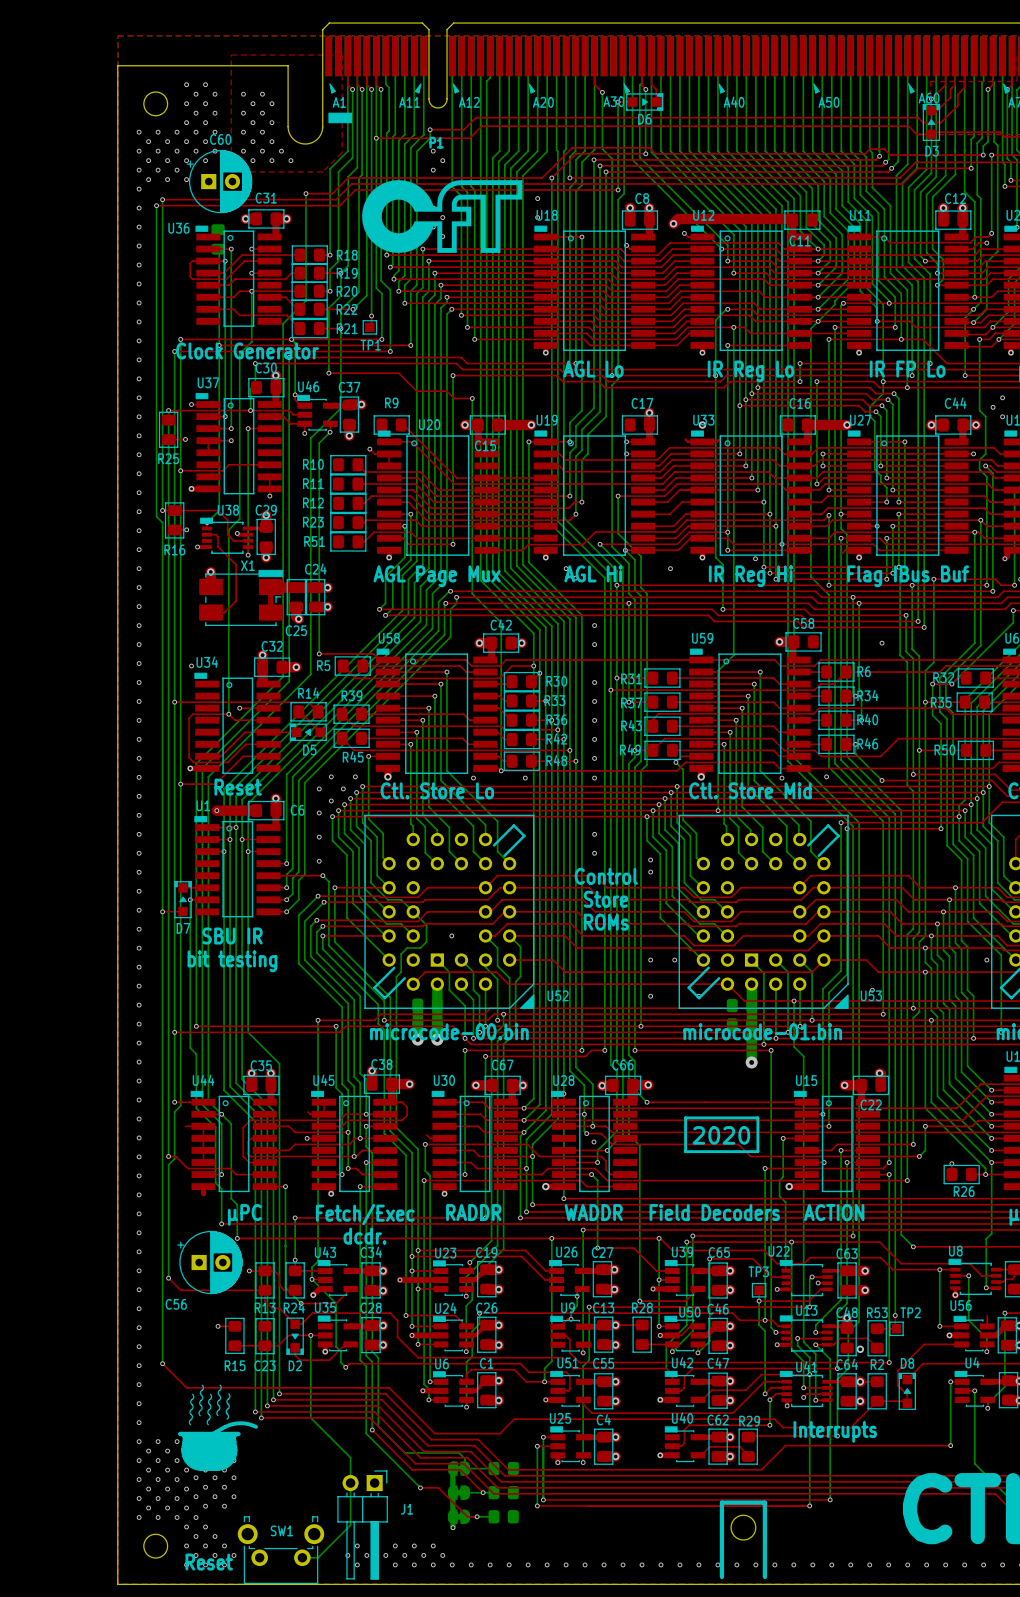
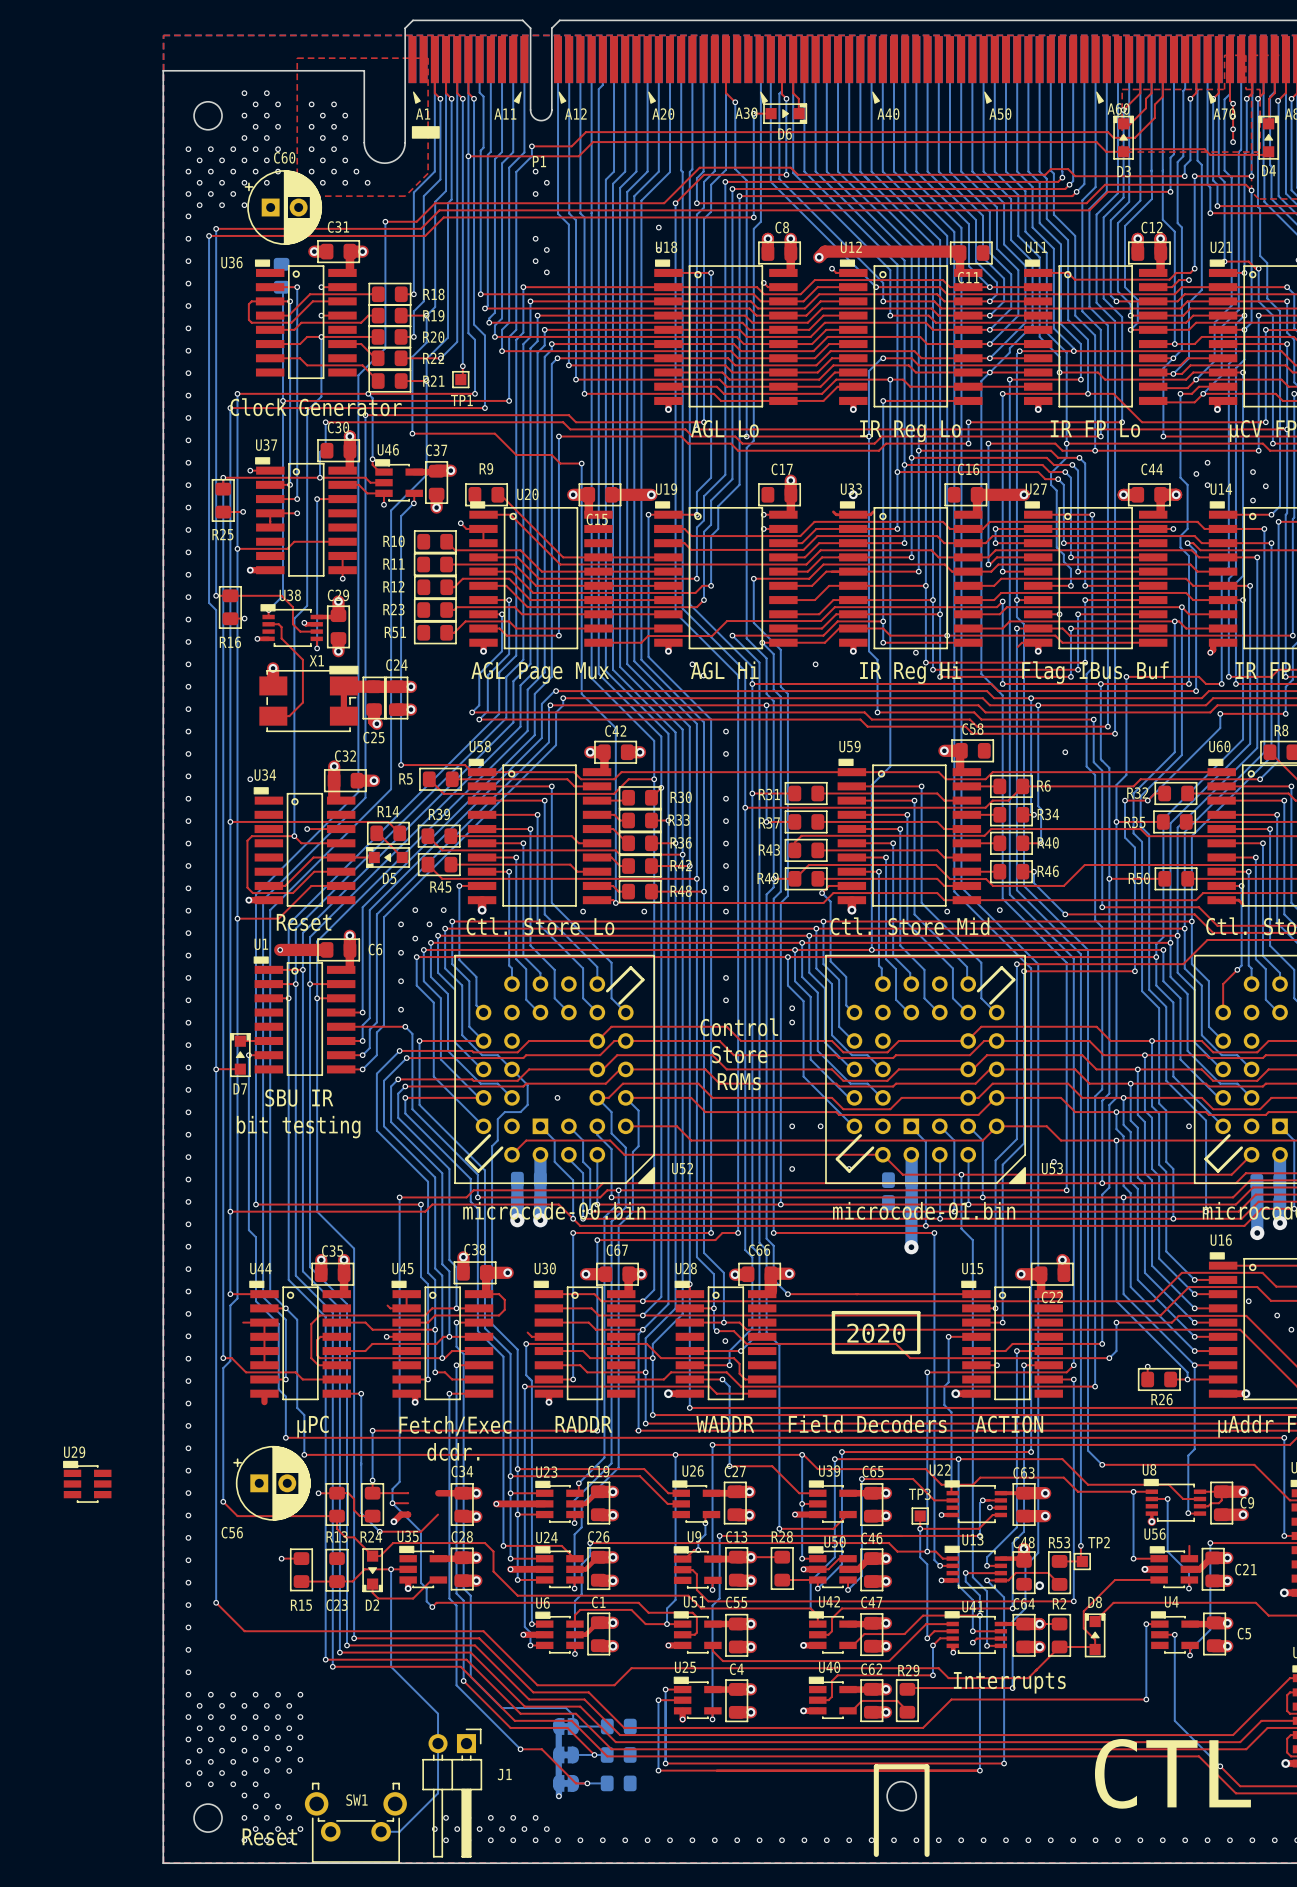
drawing: [362, 180, 523, 253] -> none
U29: none -> (87, 1481)
U43: (337, 1277) -> none
drawing: [178, 1384, 259, 1471] -> none

